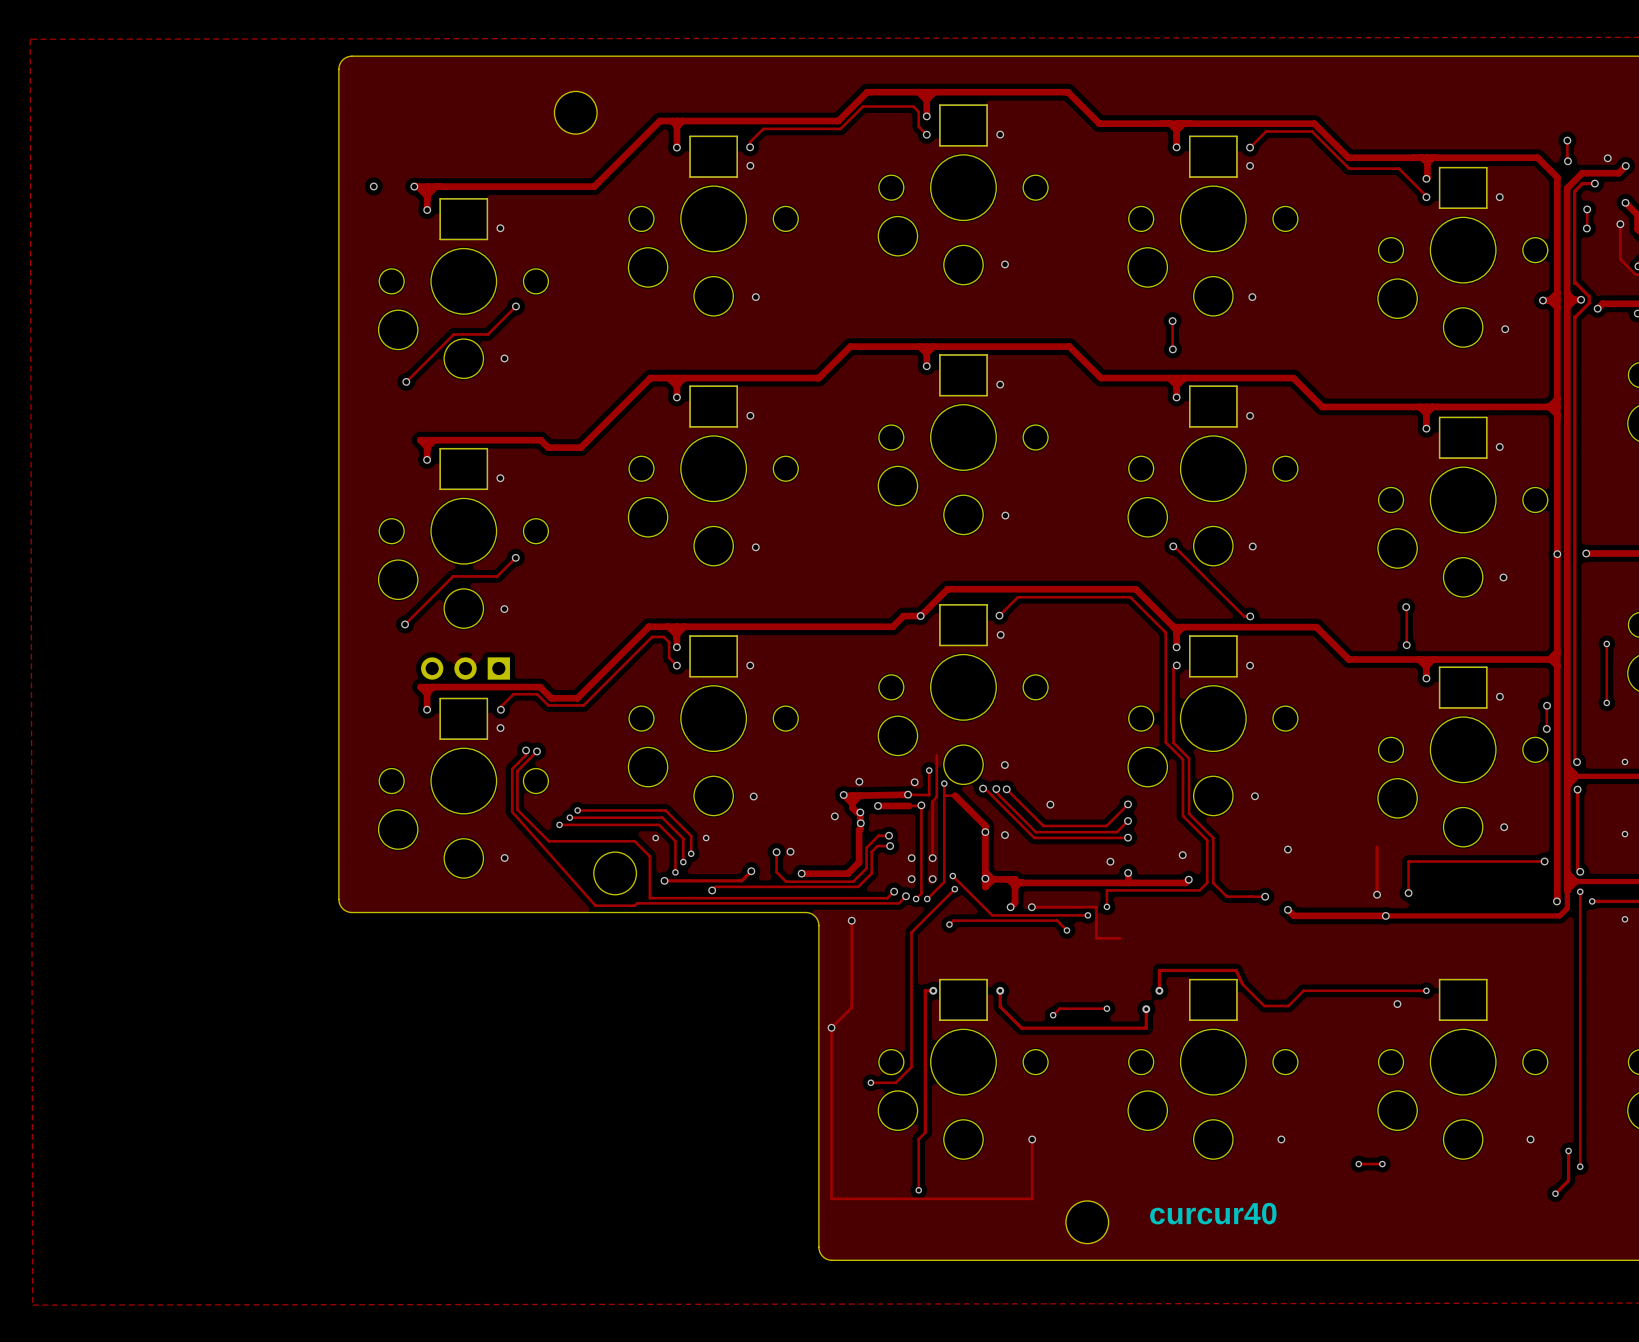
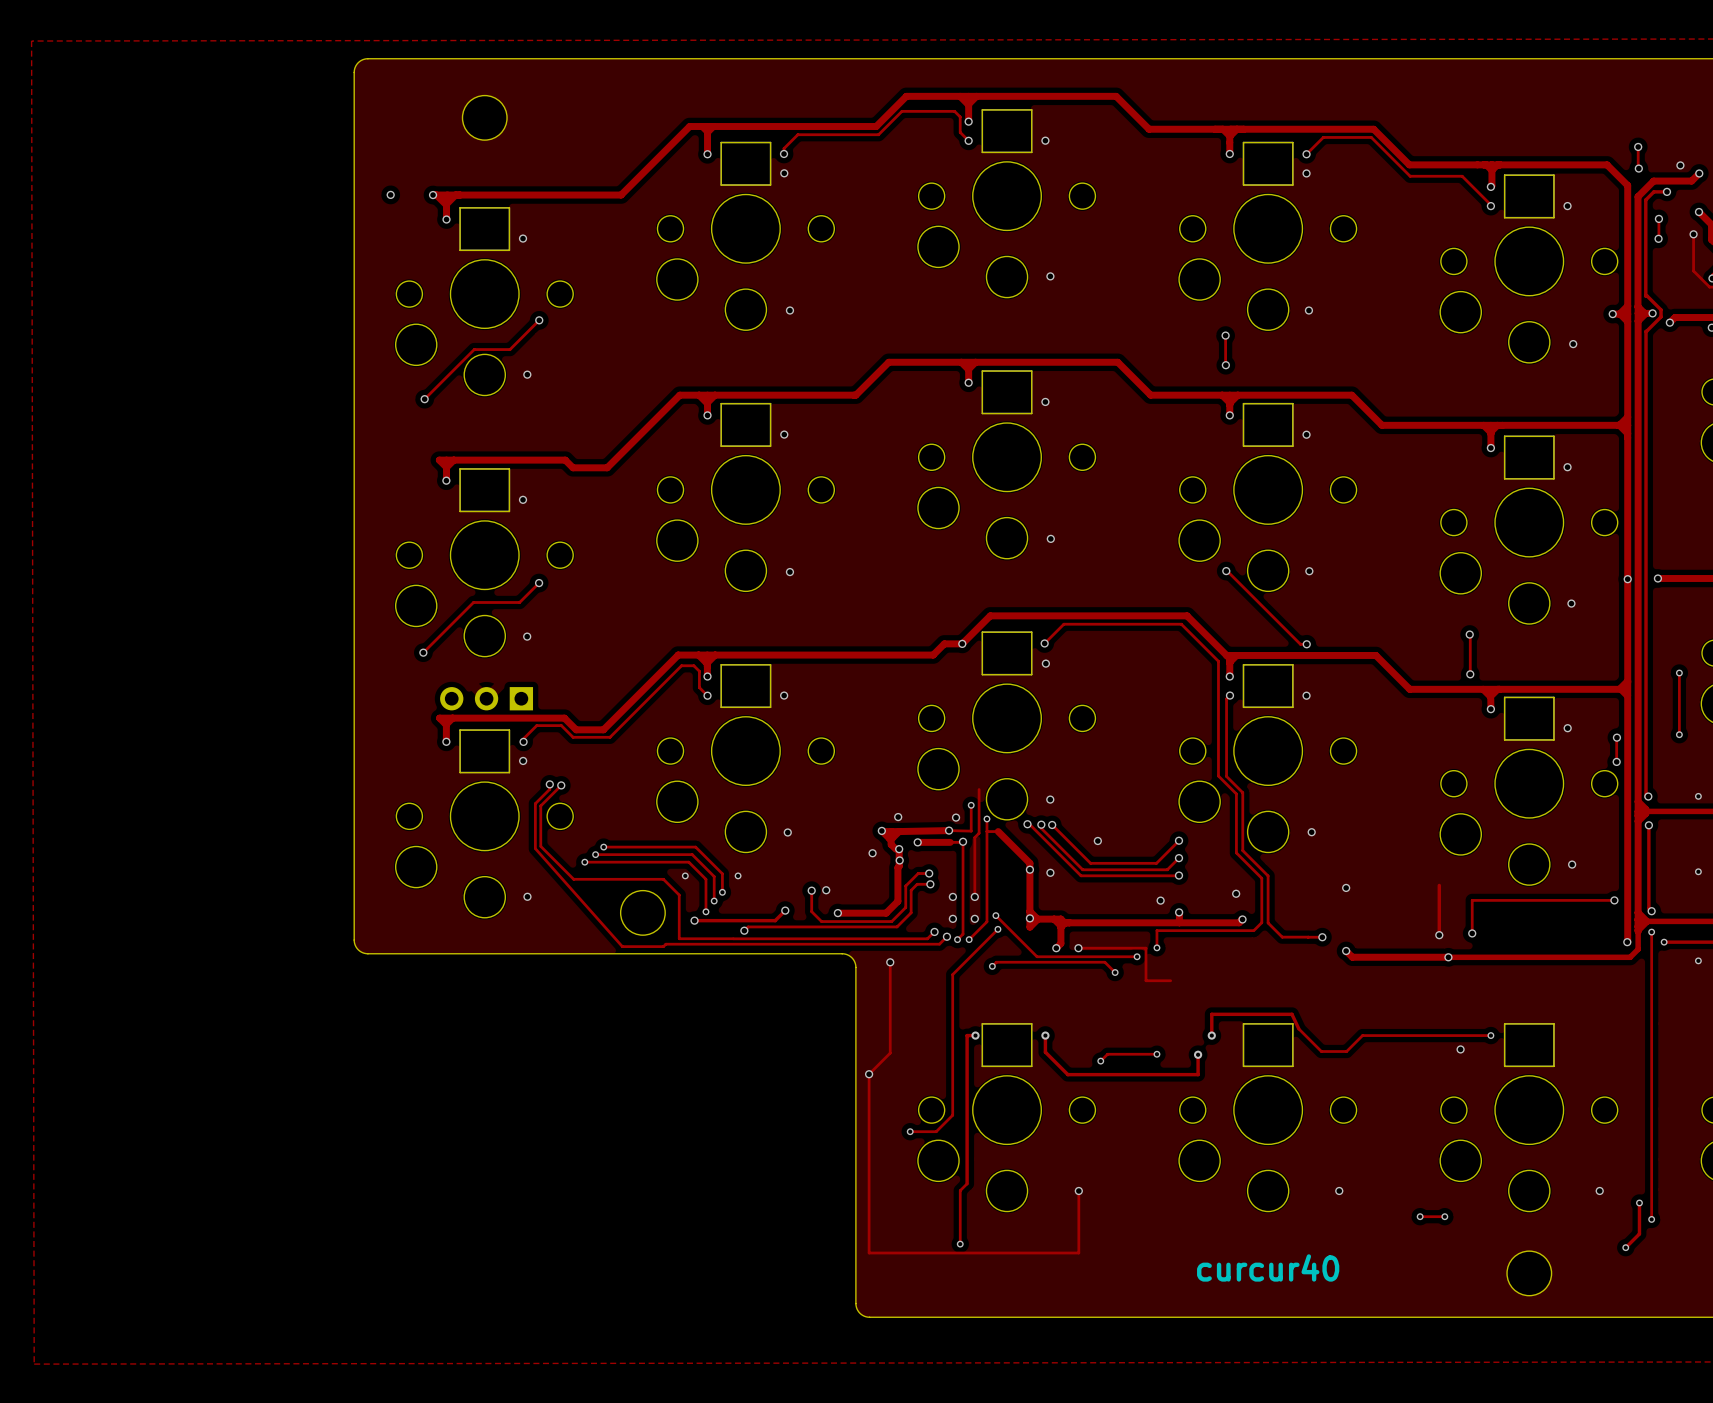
round board edge position: (575, 112) -> (484, 117)
round board edge: none -> [1506, 1250, 1553, 1297]
round board edge: [1065, 1200, 1110, 1245] -> none

